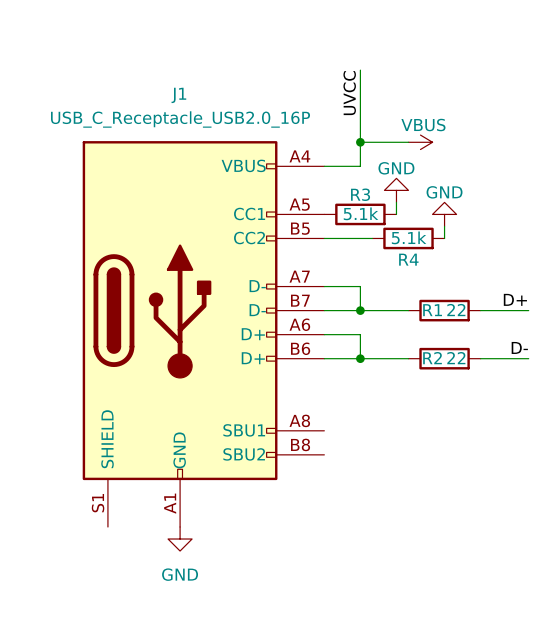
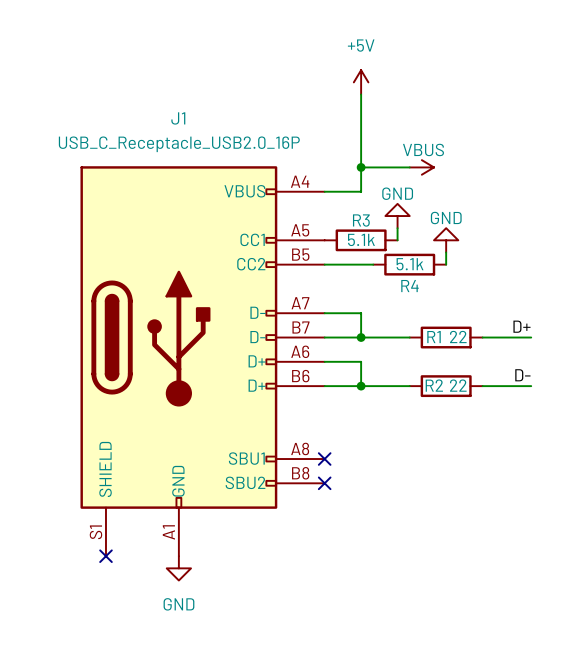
power symbol: none -> +5V (361, 82)
label: UVCC (349, 93) -> none
no-connect mark: none -> (324, 459)
no-connect mark: none -> (324, 483)
no-connect mark: none -> (105, 556)

